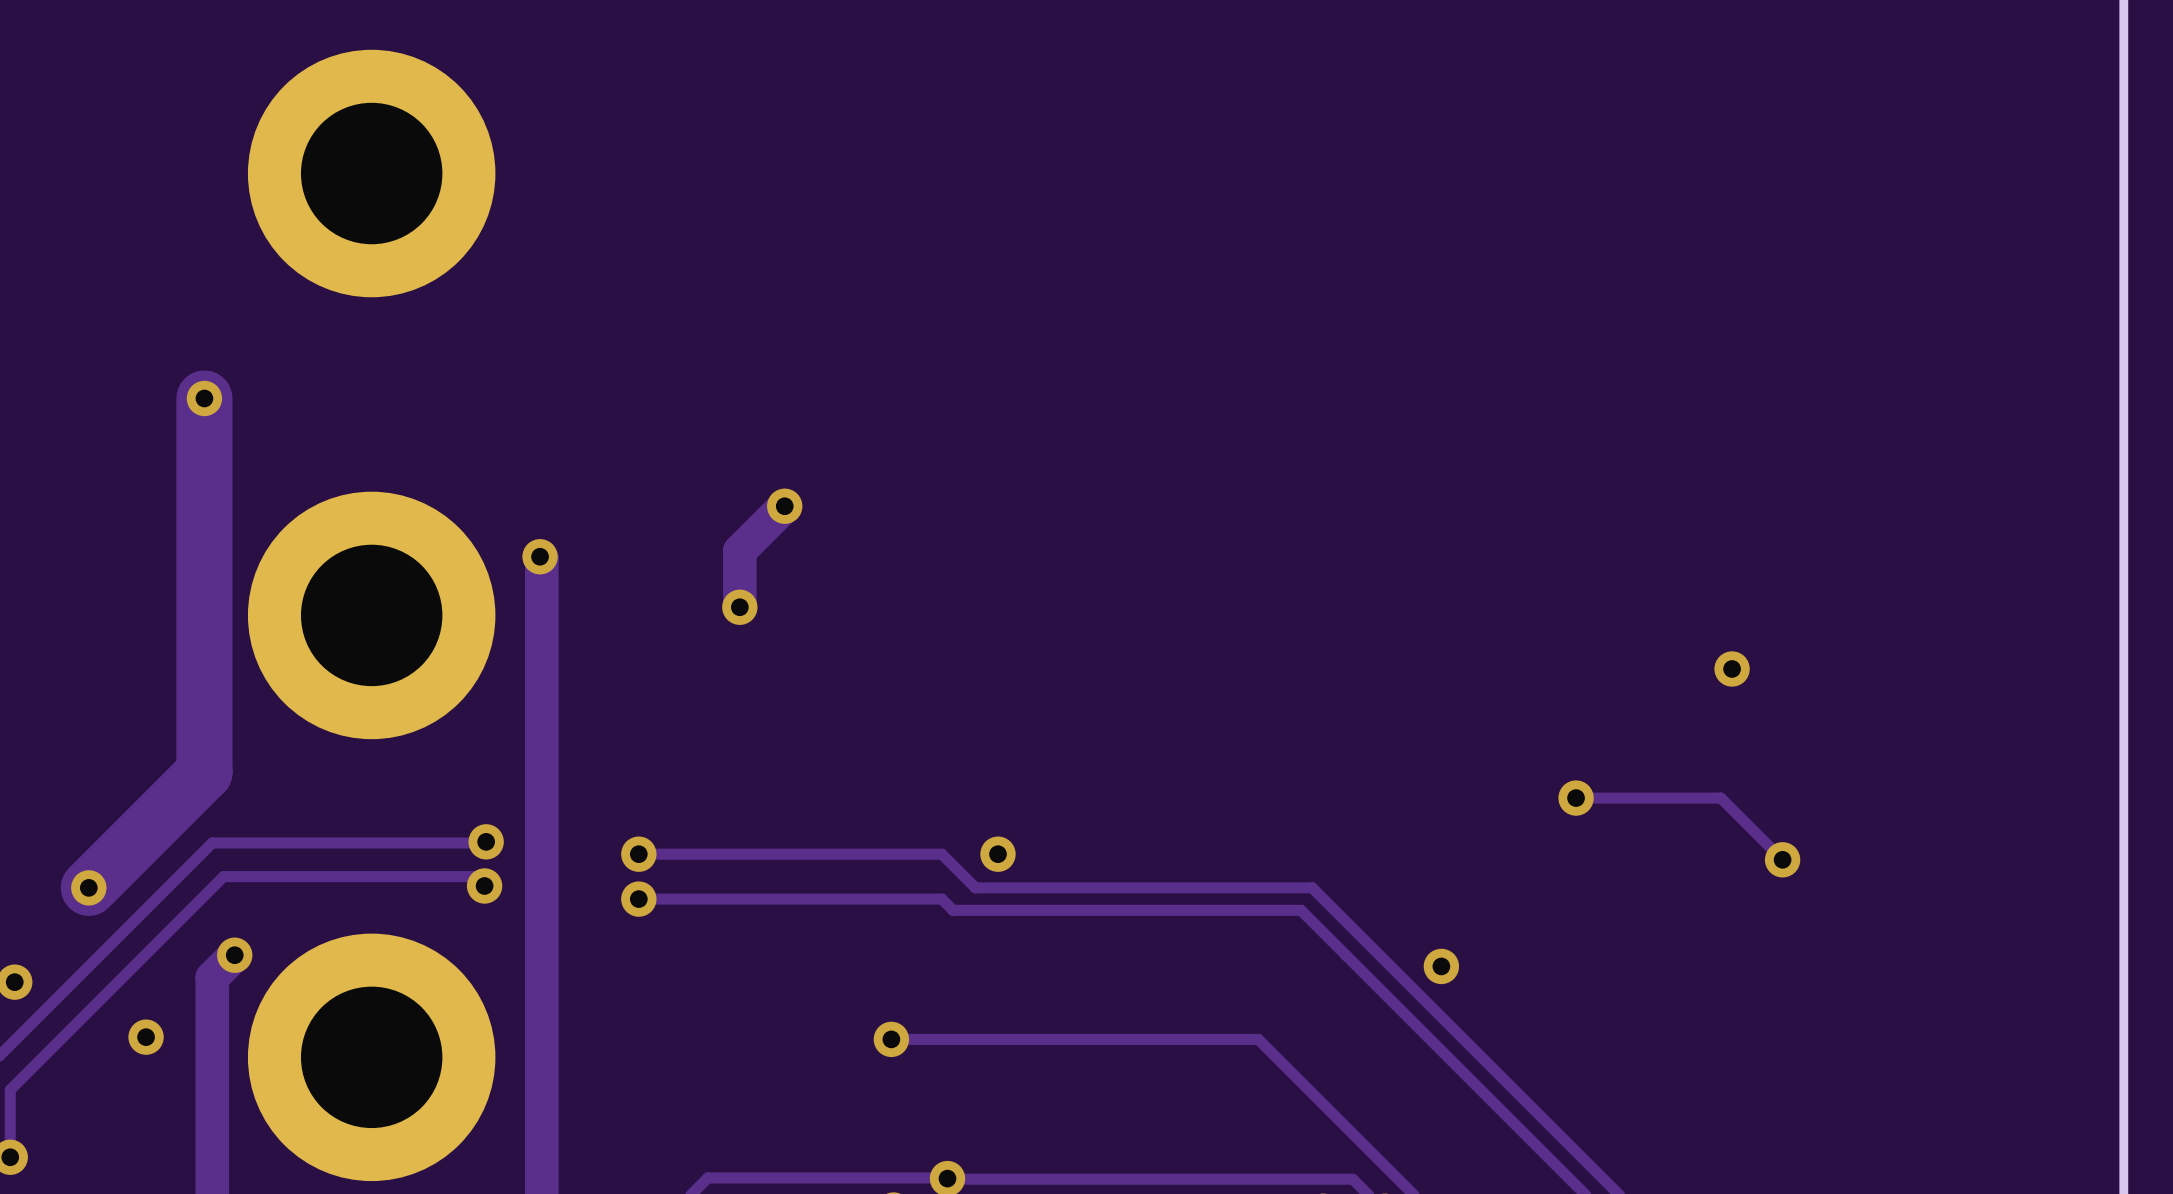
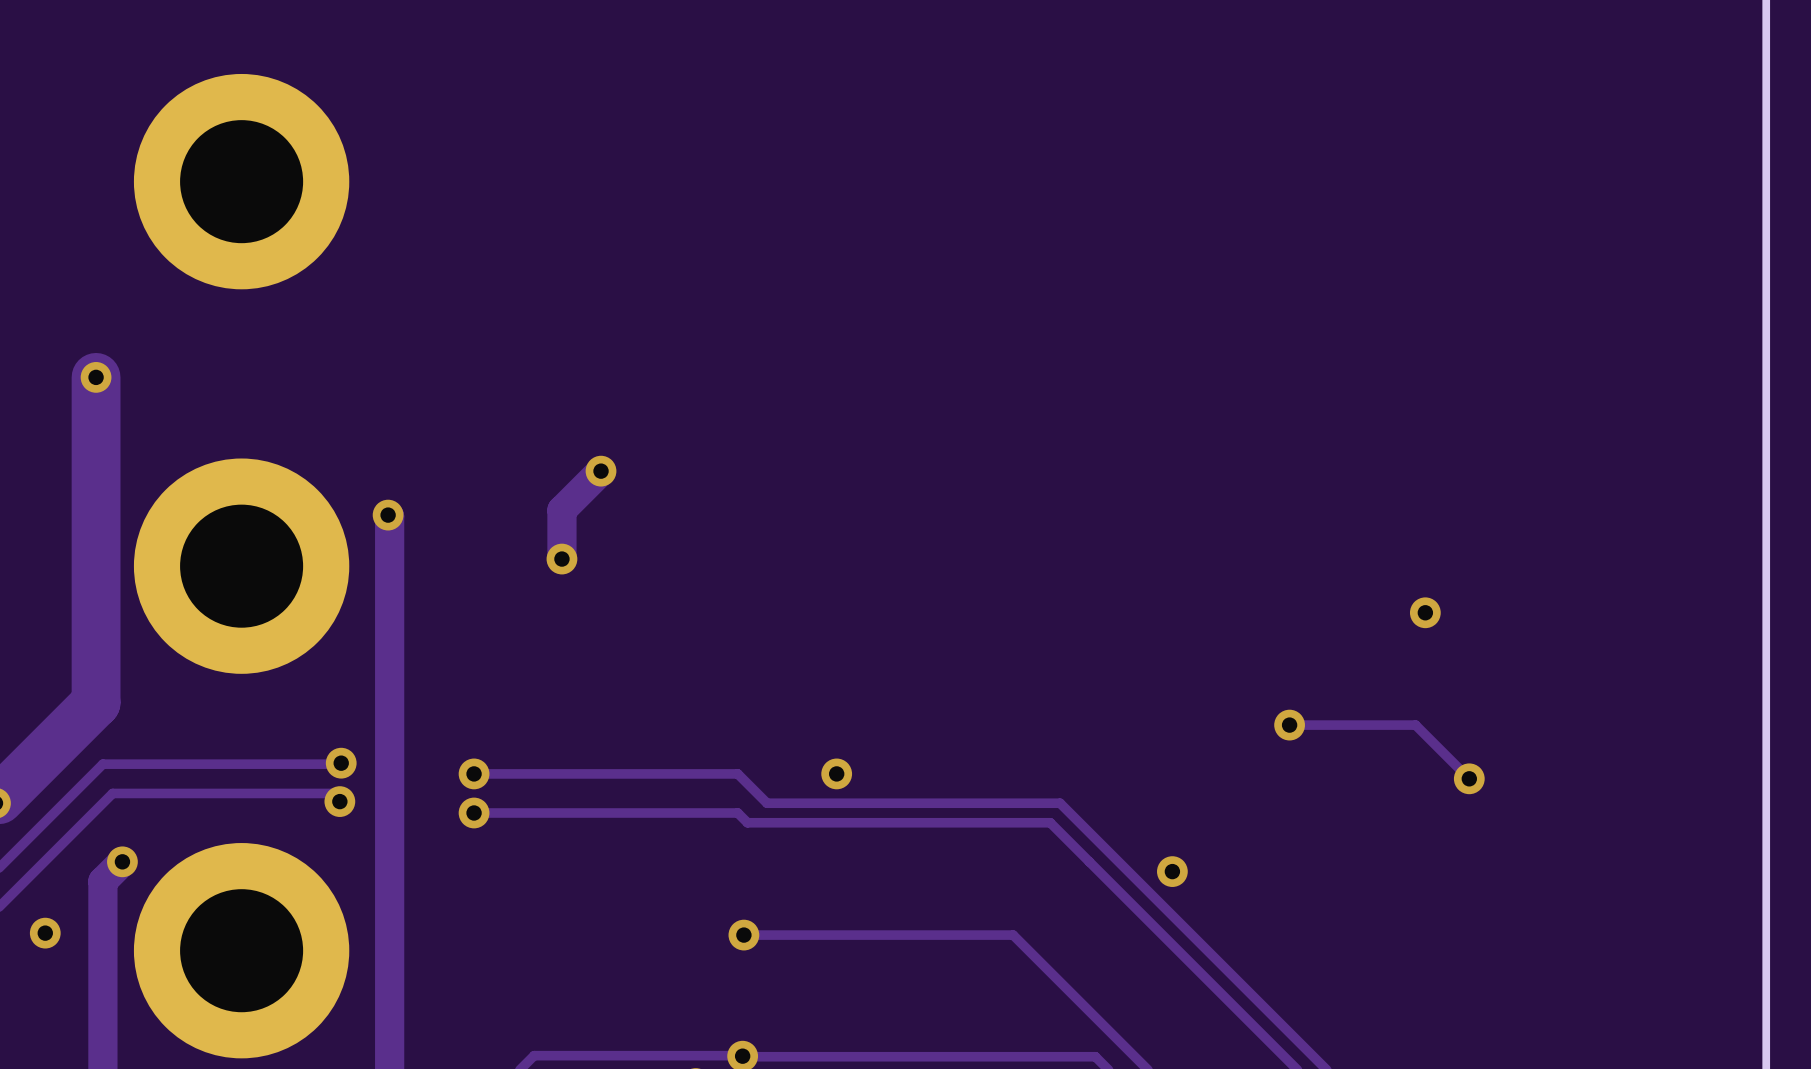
via position: (998, 854) -> (836, 773)
via position: (891, 1039) -> (743, 935)
track: (948, 1039) (891, 1039) -> none

